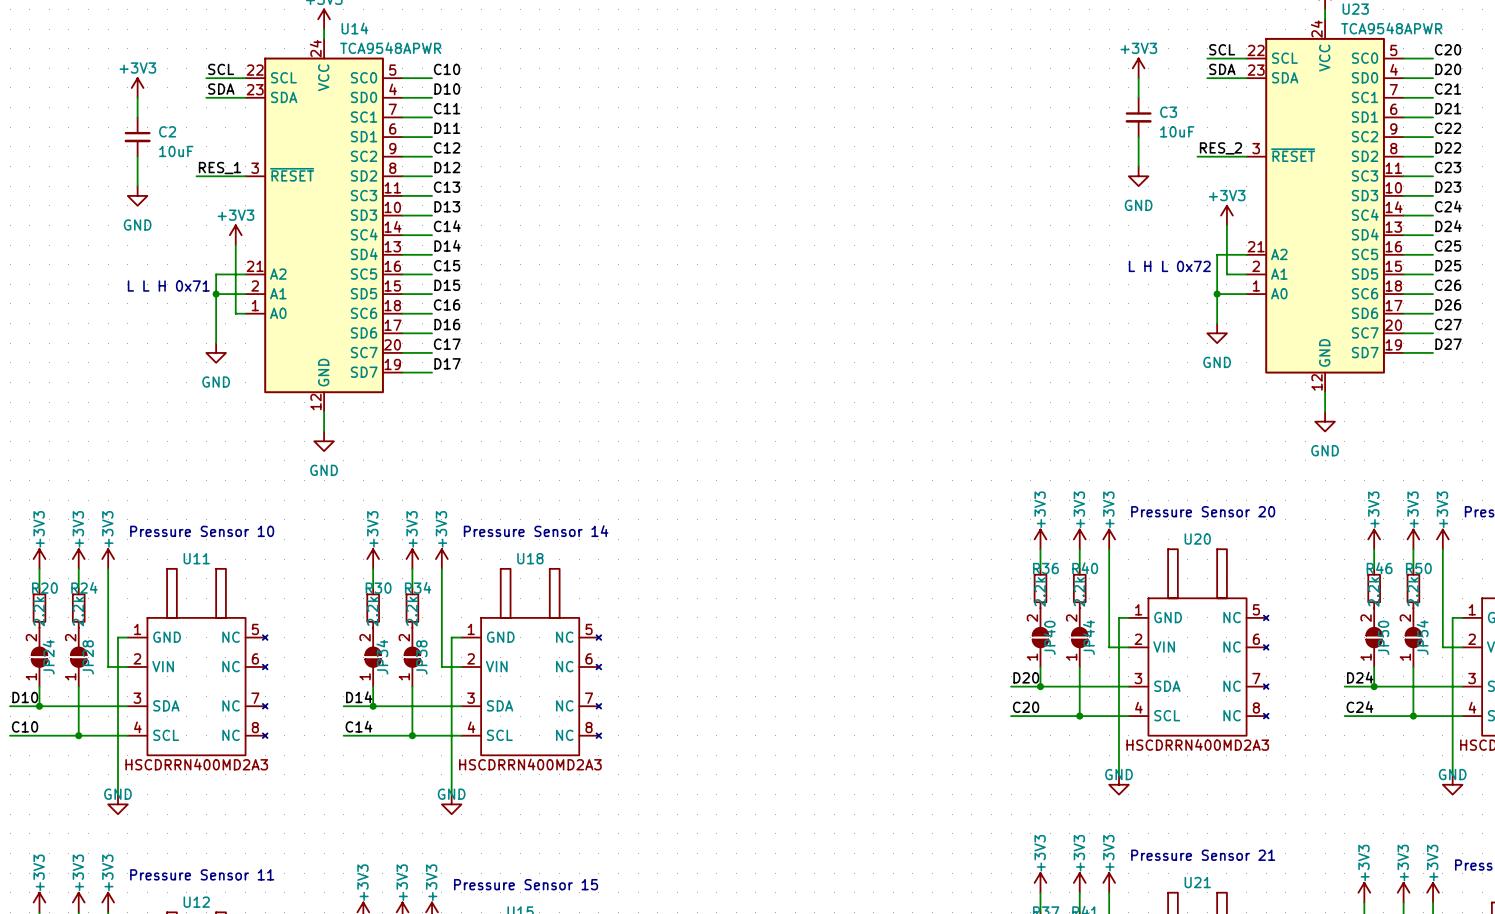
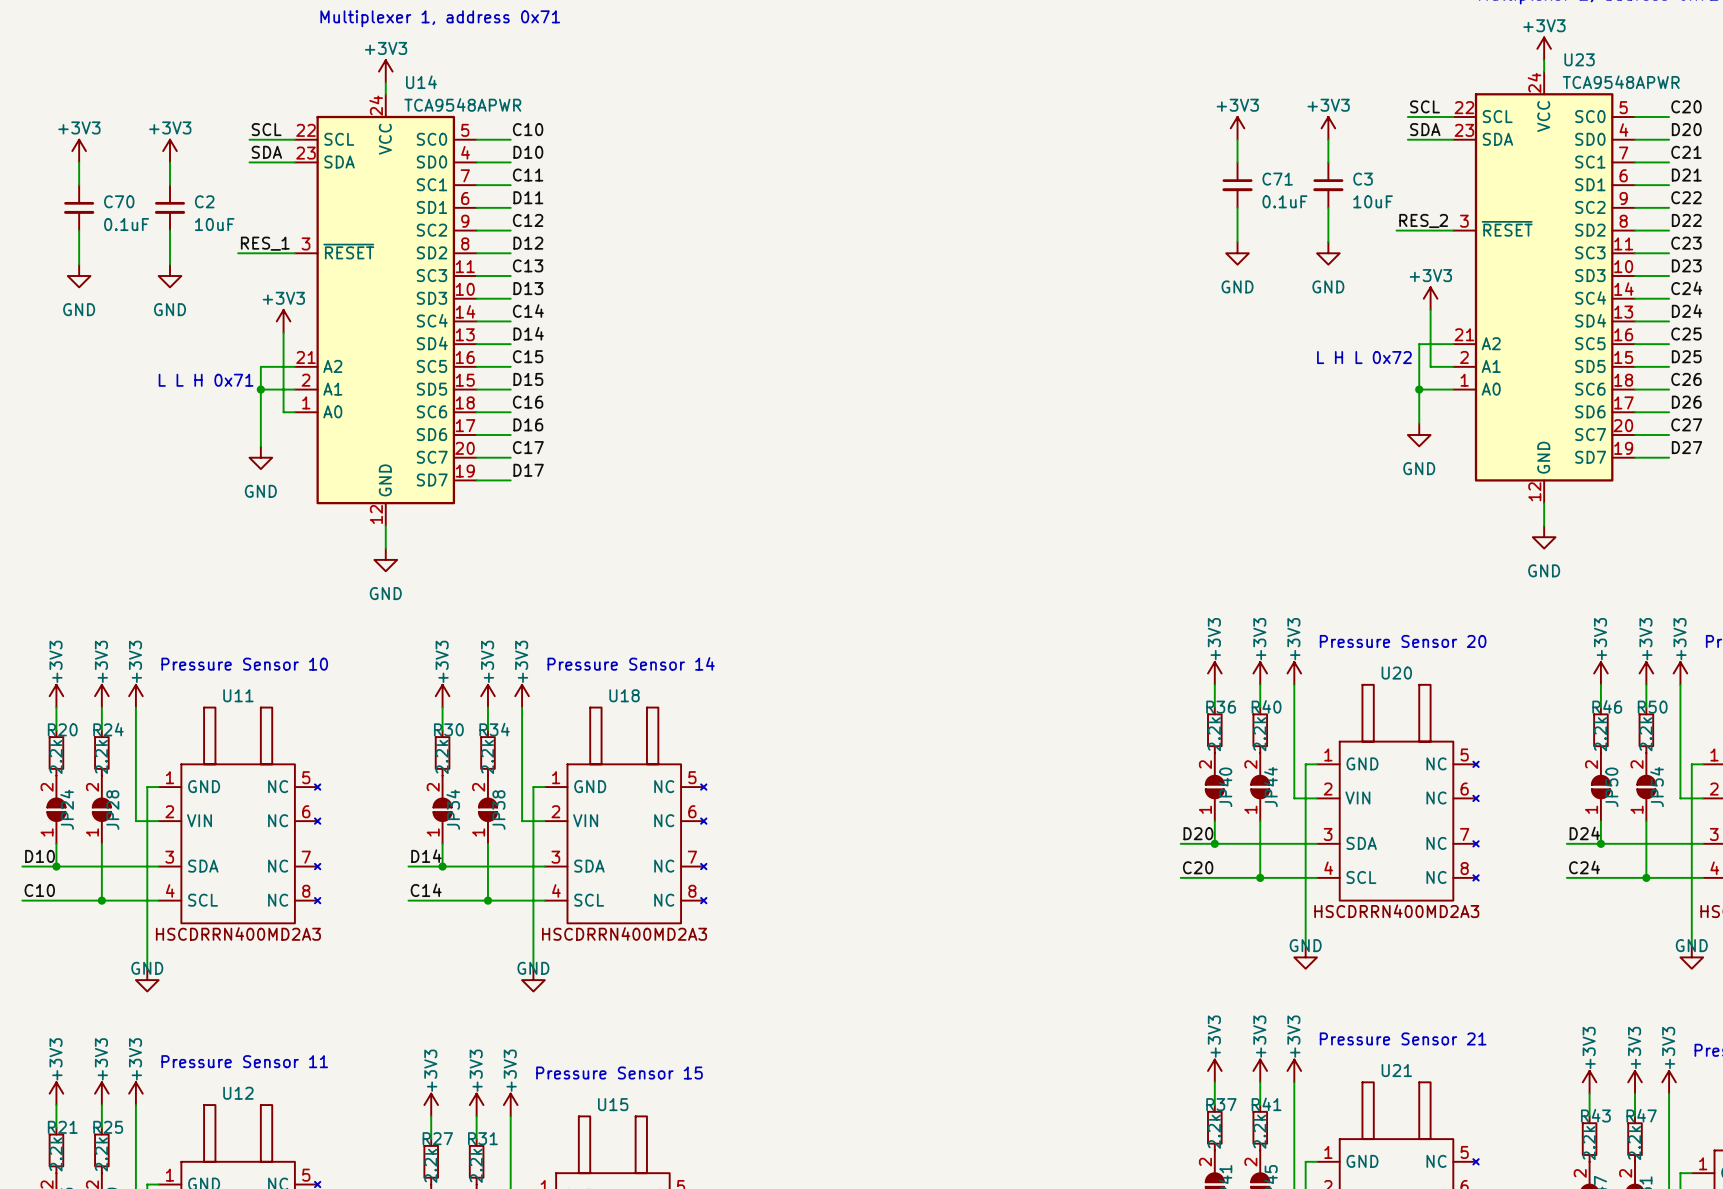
power symbol: none -> +3V3 (1237, 128)
wire: none -> (1237, 139) (1237, 162)
power symbol: none -> +3V3 (79, 151)
wire: none -> (79, 162) (79, 185)
C71: none -> 0.1uF (1237, 185)
C70: none -> 0.1uF (79, 207)
wire: none -> (1237, 207) (1237, 241)
wire: none -> (79, 230) (79, 264)
power symbol: none -> GND (1237, 253)
power symbol: none -> GND (79, 276)

